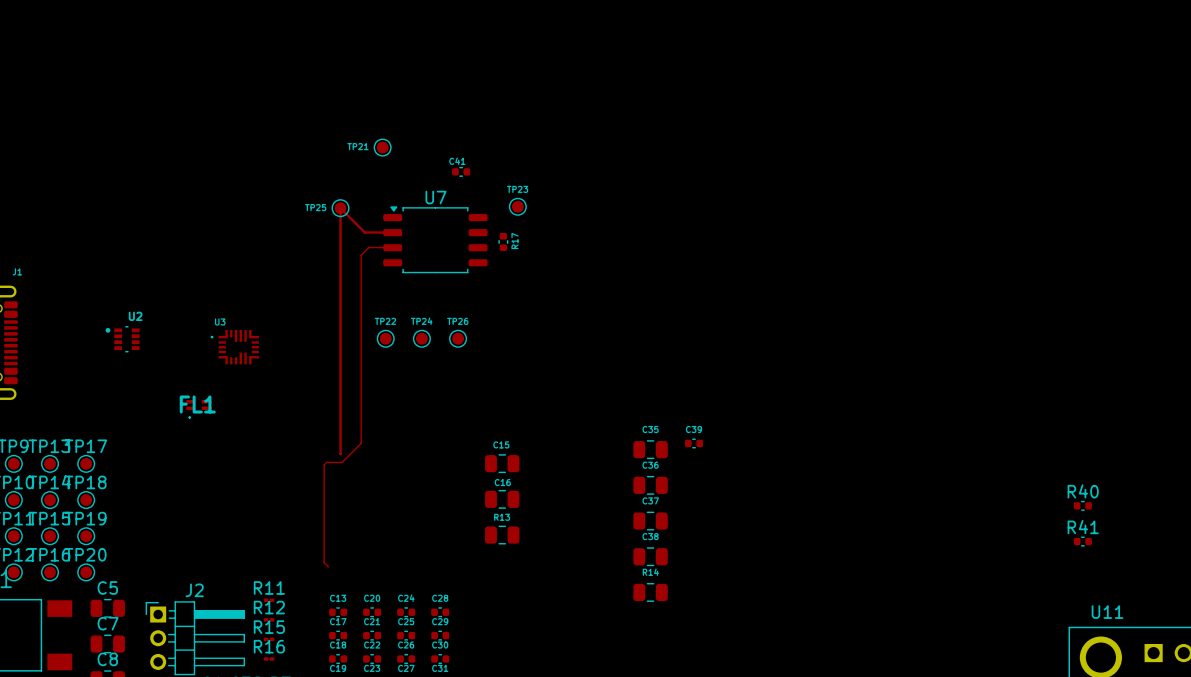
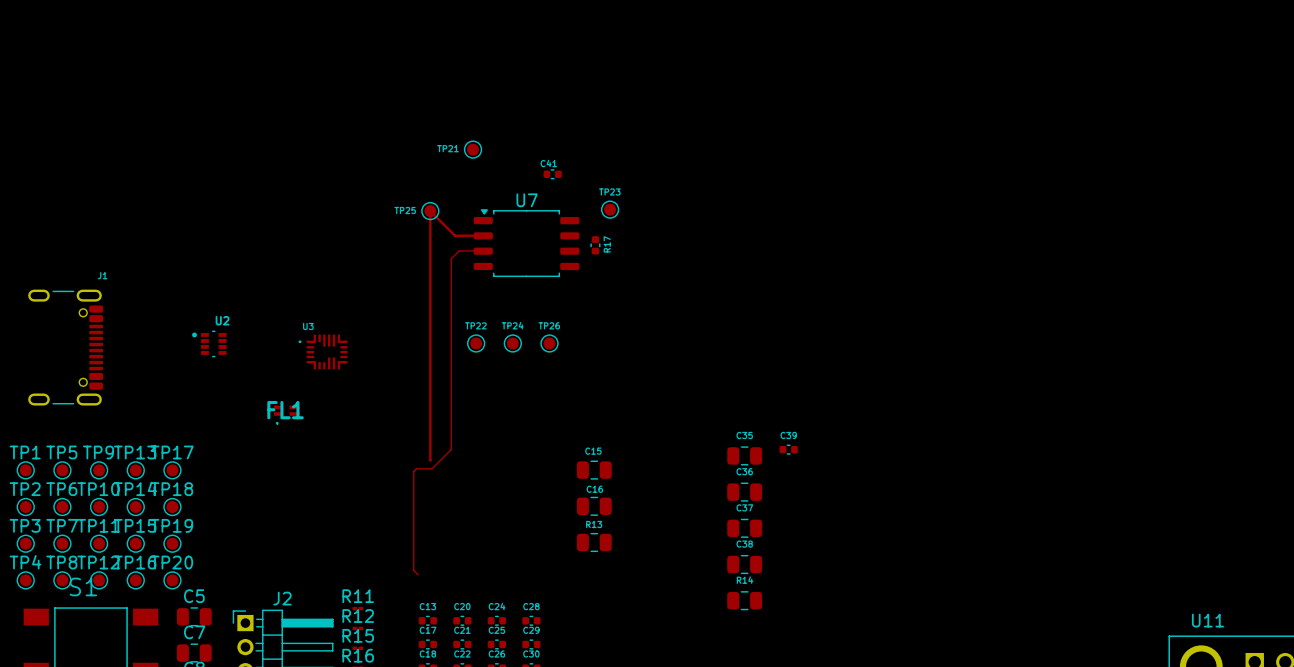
R40: (1082, 505) -> none
R41: (1082, 541) -> none

